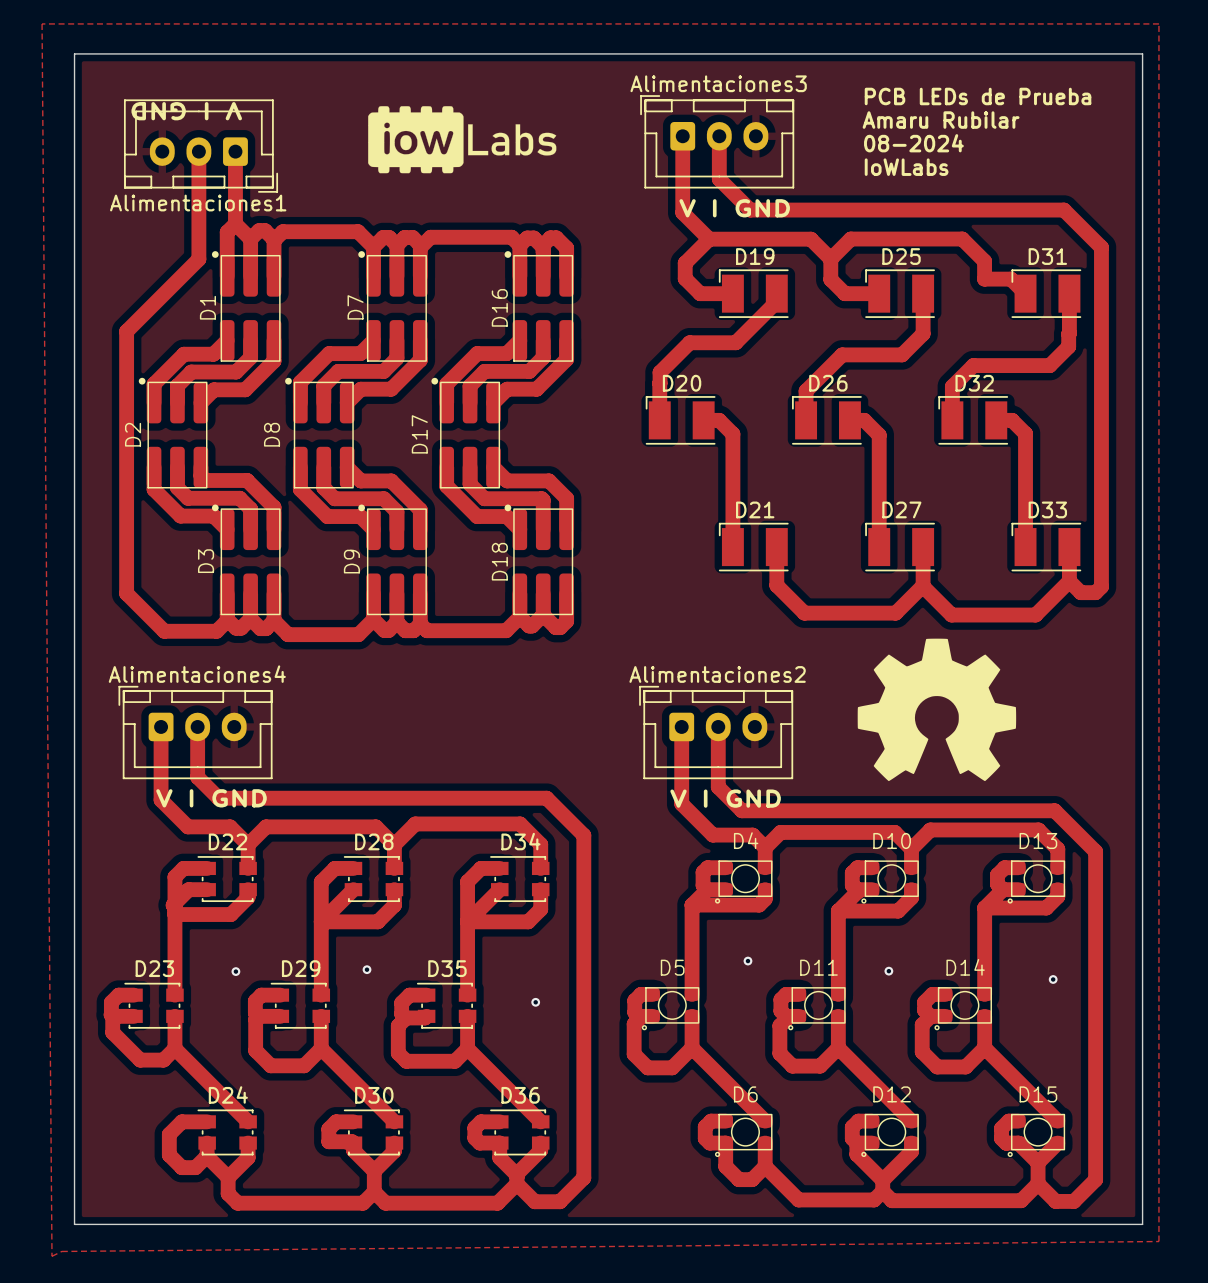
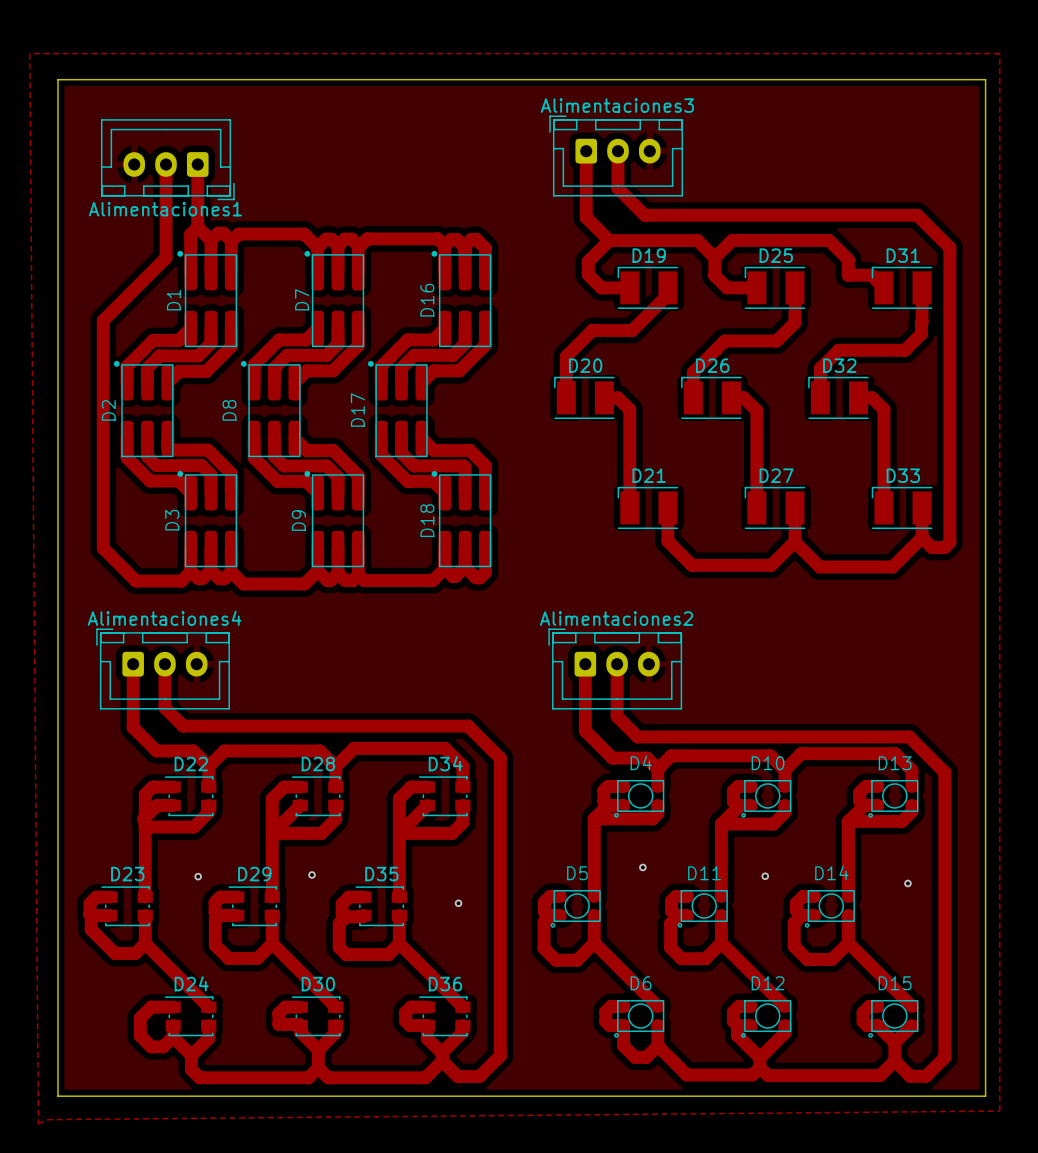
text: PCB LEDs de Prueba (978, 96) -> none
drawing: [368, 106, 557, 174] -> none
text: V I GND (186, 111) -> none
text: Amaru Rubilar (941, 120) -> none
text: 08-2024 (913, 143) -> none
text: IoWLabs (906, 167) -> none
text: V I GND (734, 208) -> none
drawing: [857, 638, 1017, 782] -> none
text: V I GND (211, 798) -> none
text: V I GND (725, 798) -> none

